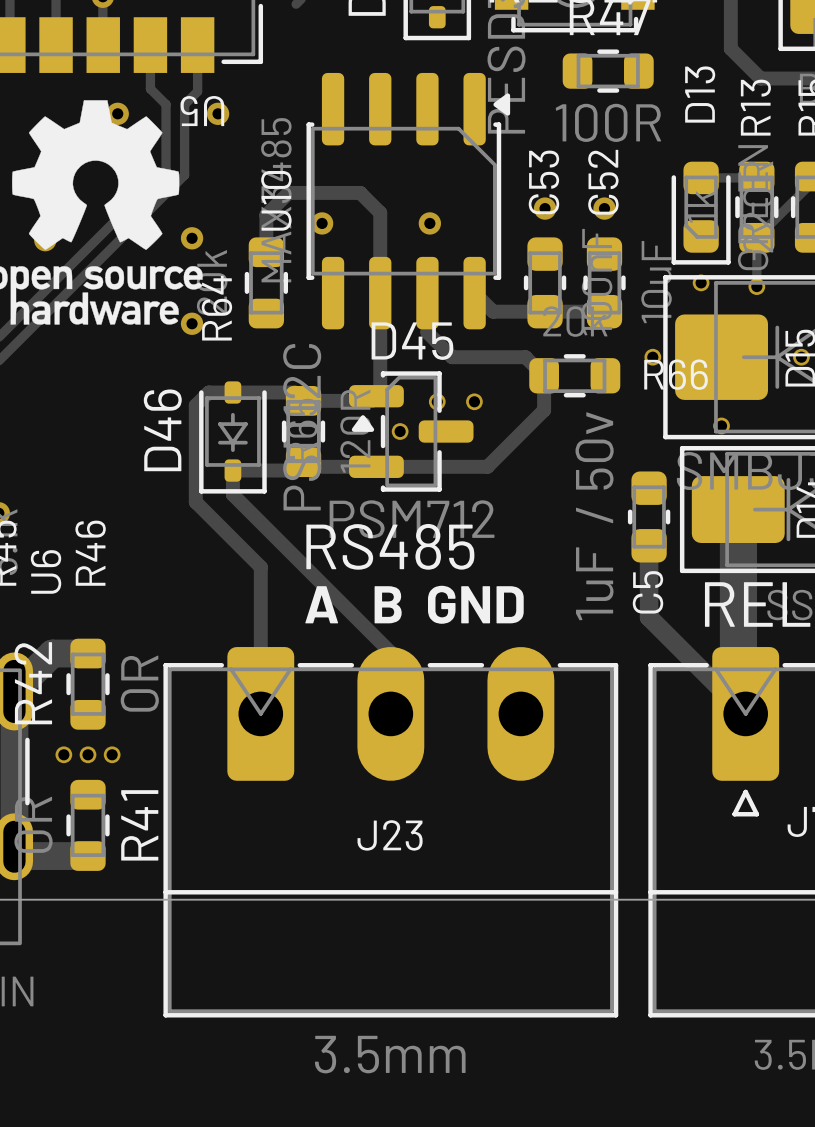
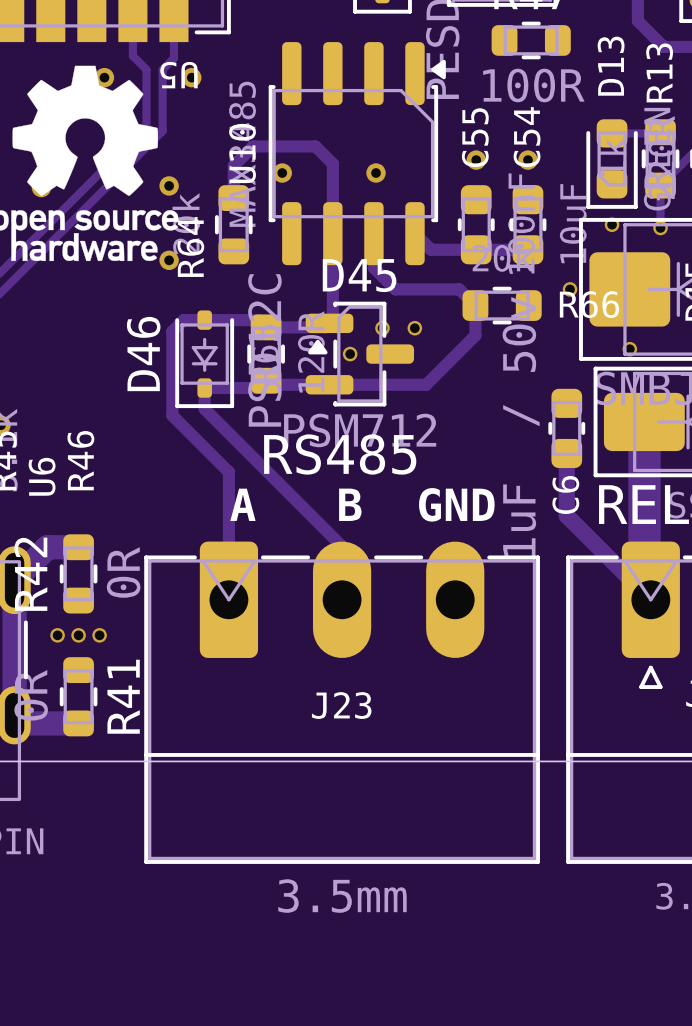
C53 name: C53 (543, 182) -> C55 (475, 137)
C52 name: C52 (603, 182) -> C54 (527, 137)
C5 name: C5 (648, 592) -> C6 (565, 494)

